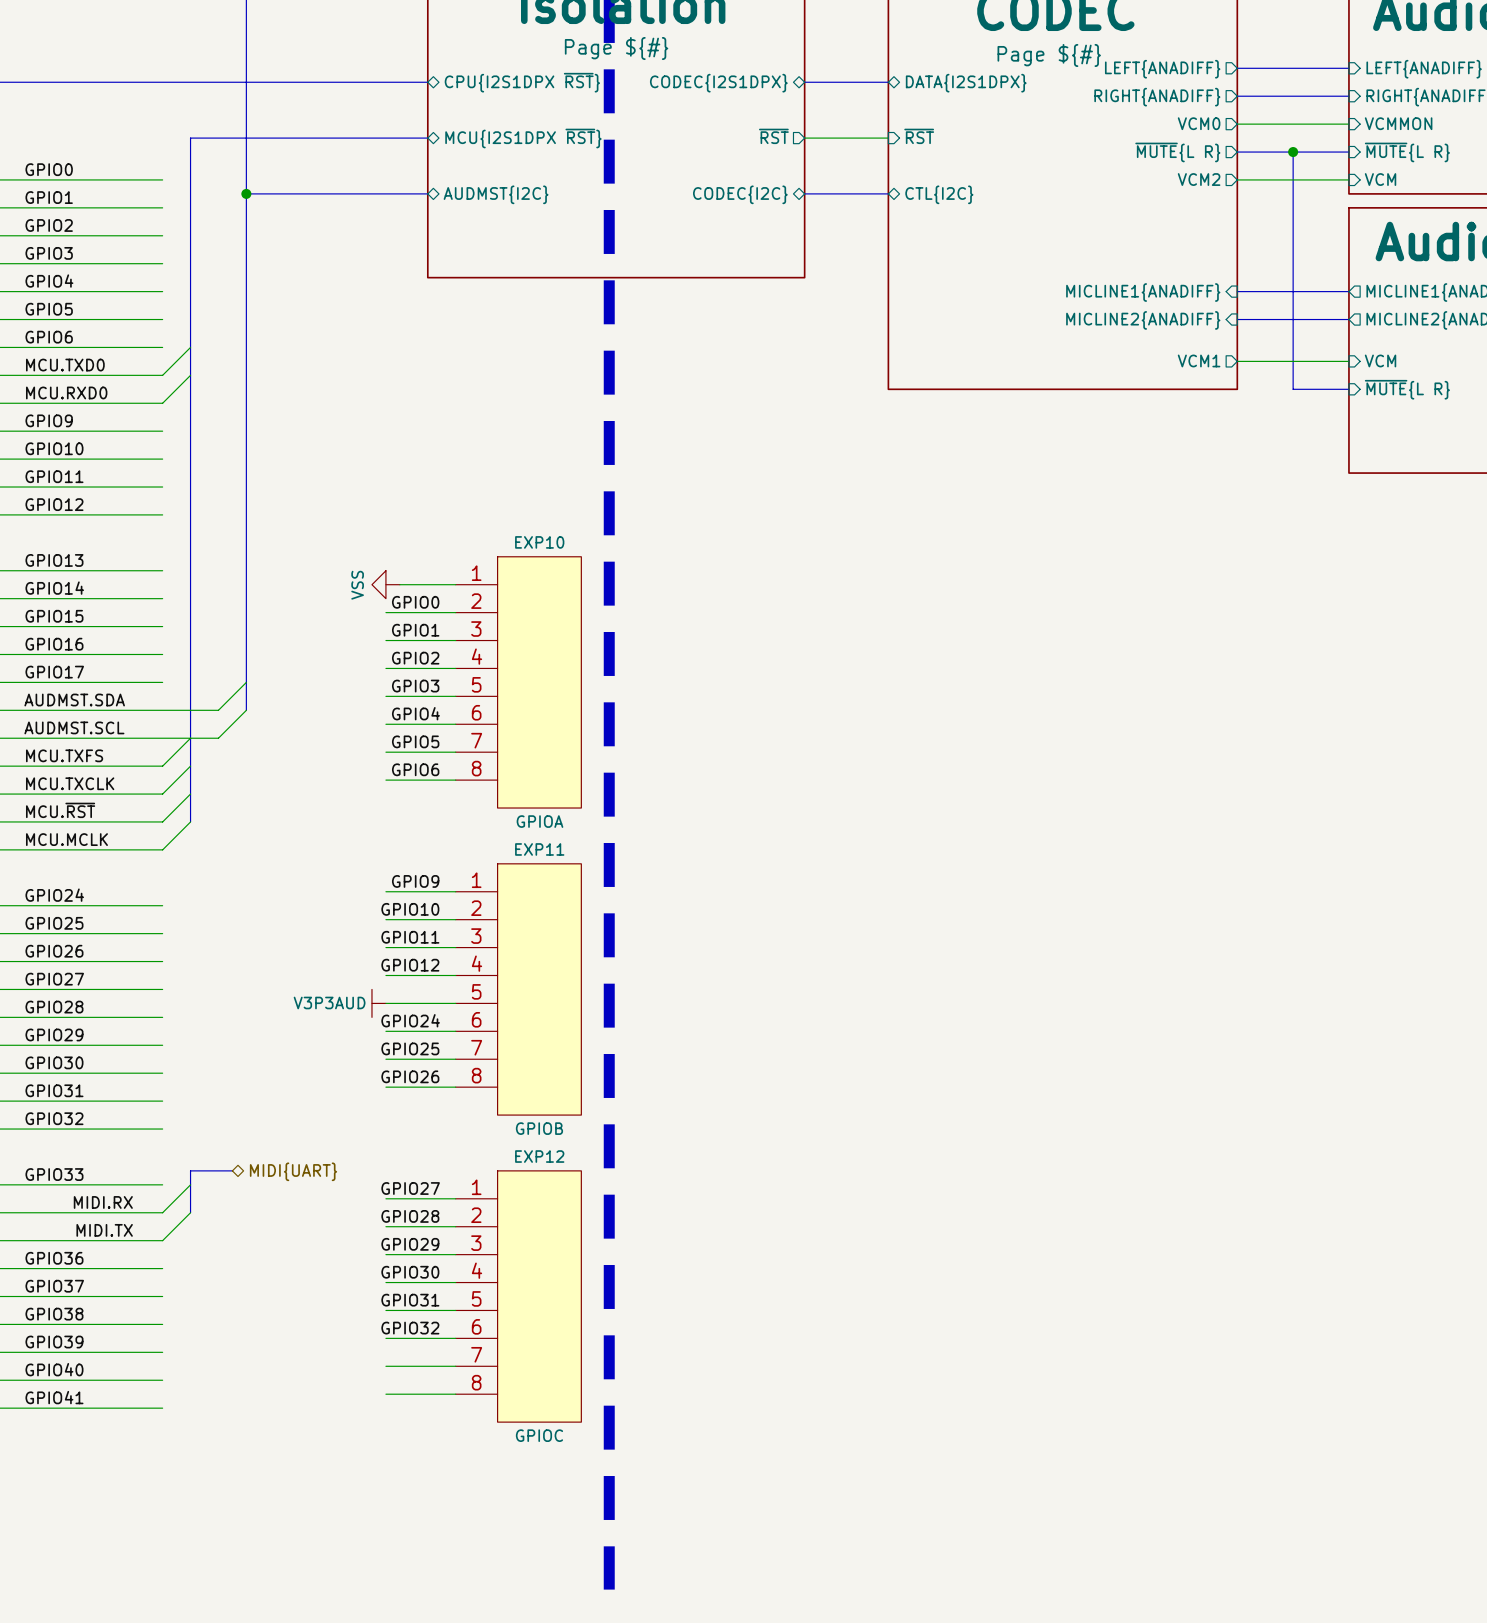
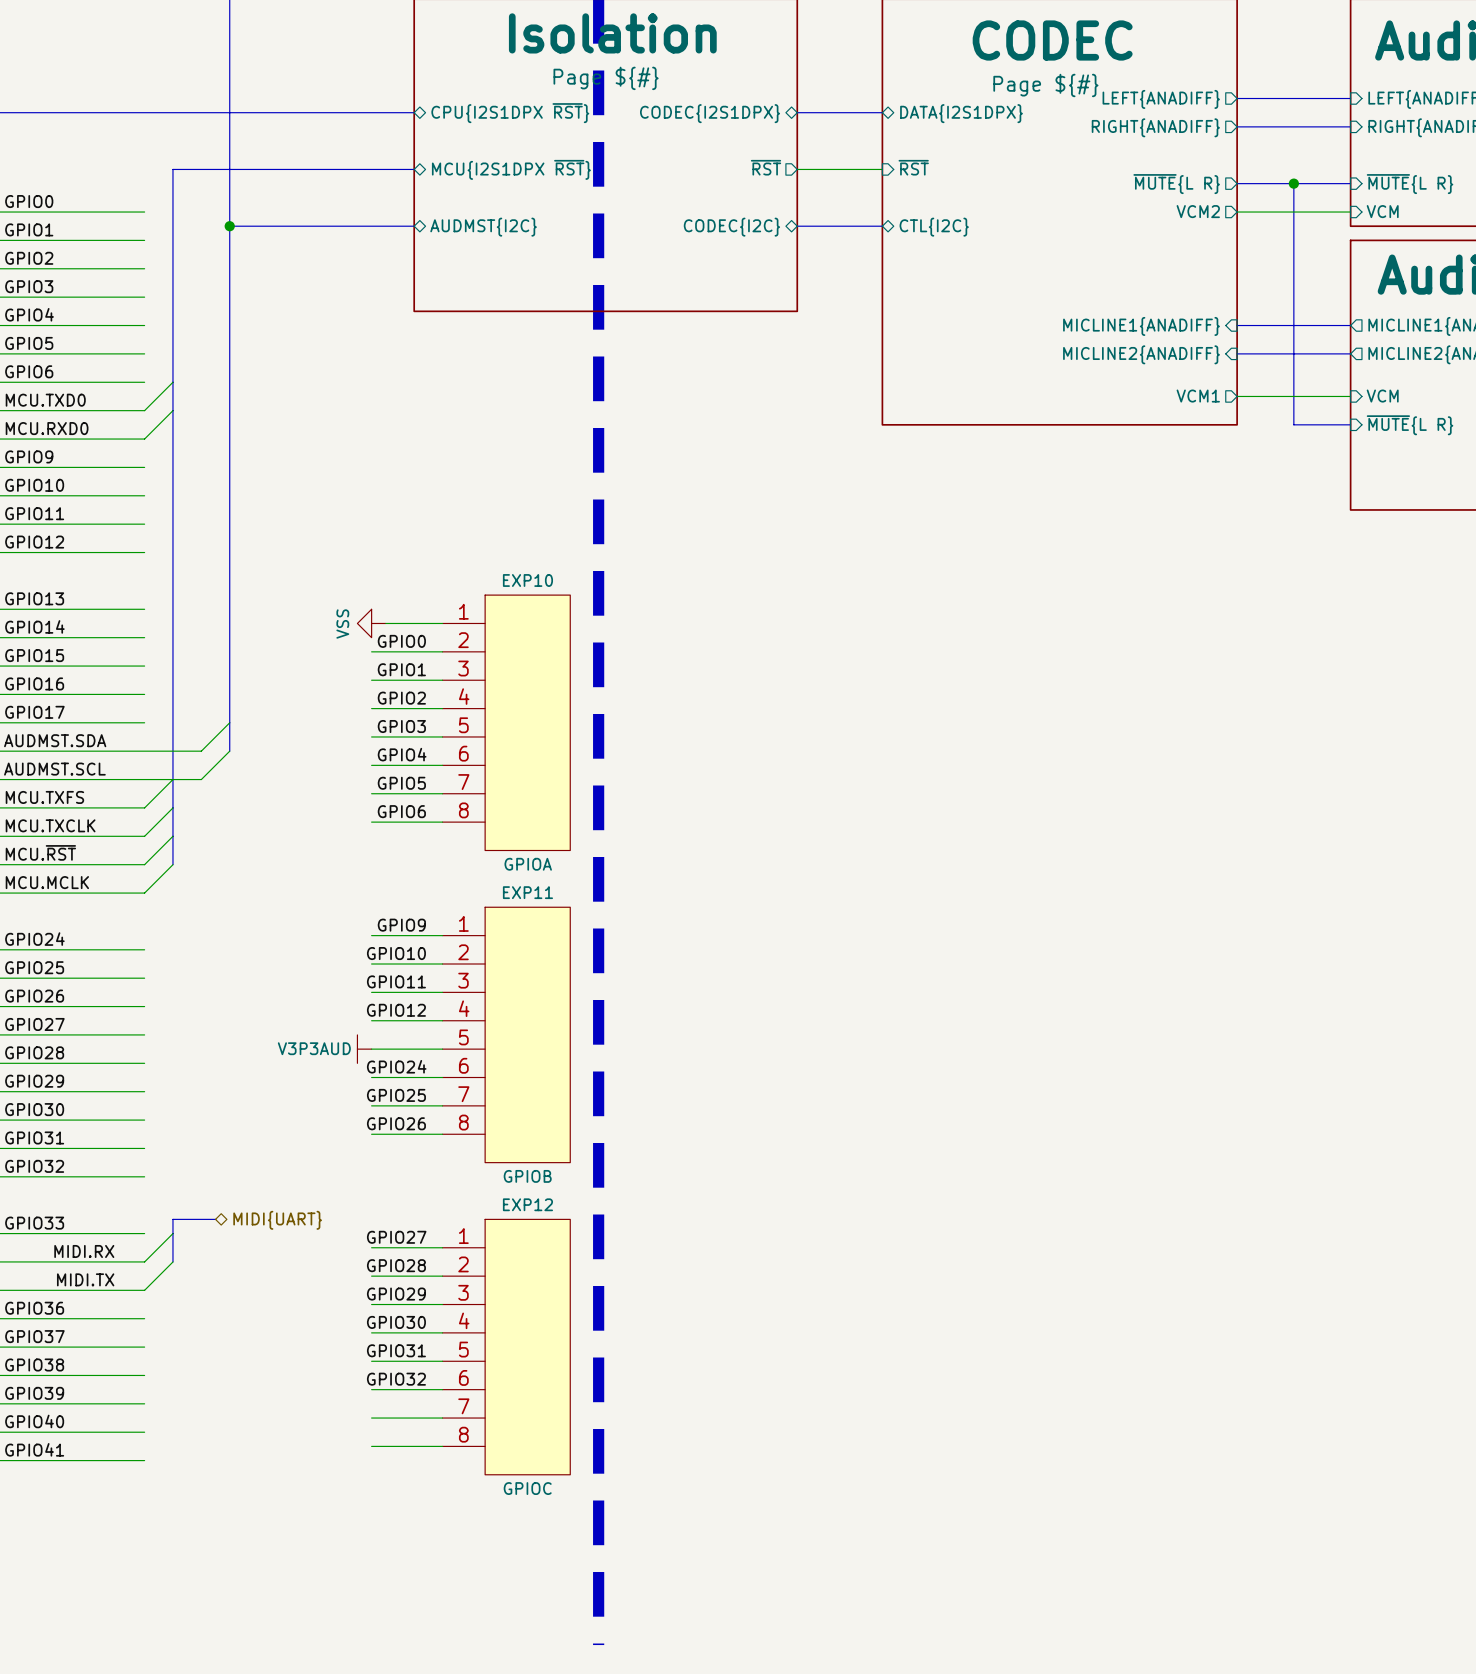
sheet pin: VCM0 (1199, 123) -> none
sheet pin: VCMMON (1398, 123) -> none
wire: (1237, 124) (1348, 124) -> none

